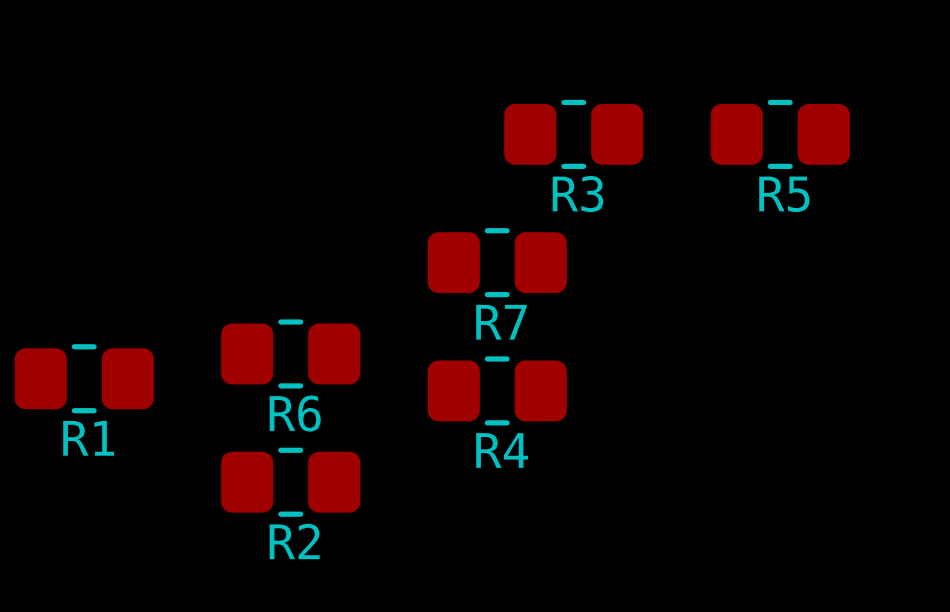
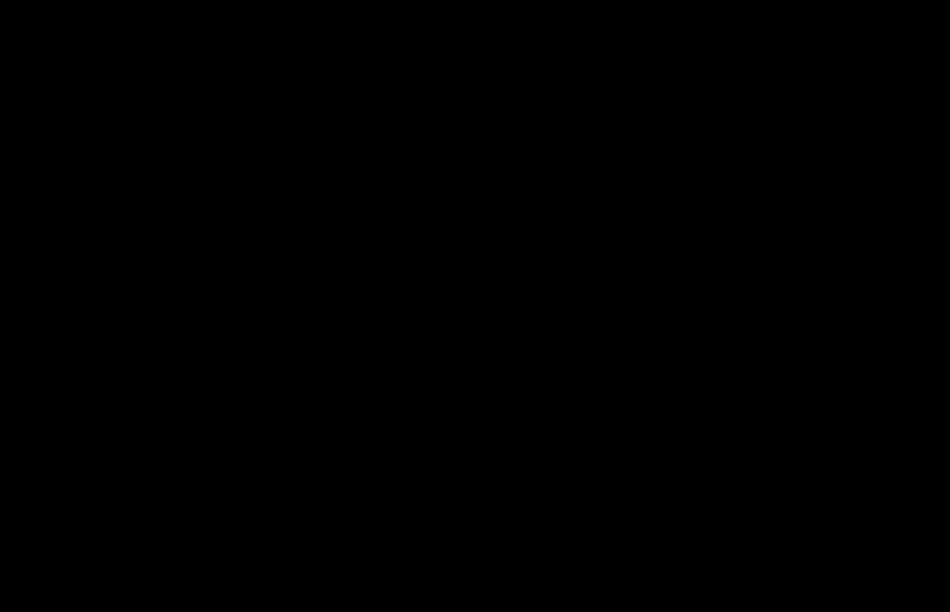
R3: (573, 134) -> none
R5: (780, 134) -> none
R7: (497, 262) -> none
R6: (290, 353) -> none
R1: (84, 378) -> none
R4: (497, 390) -> none
R2: (290, 482) -> none

